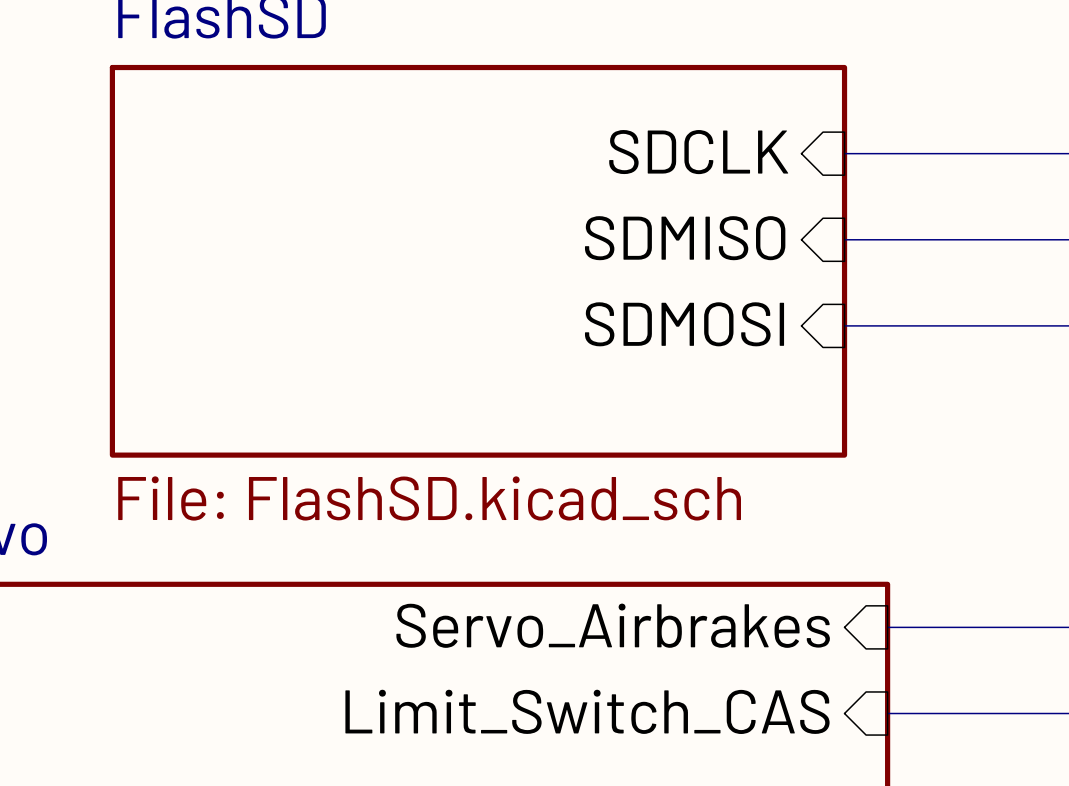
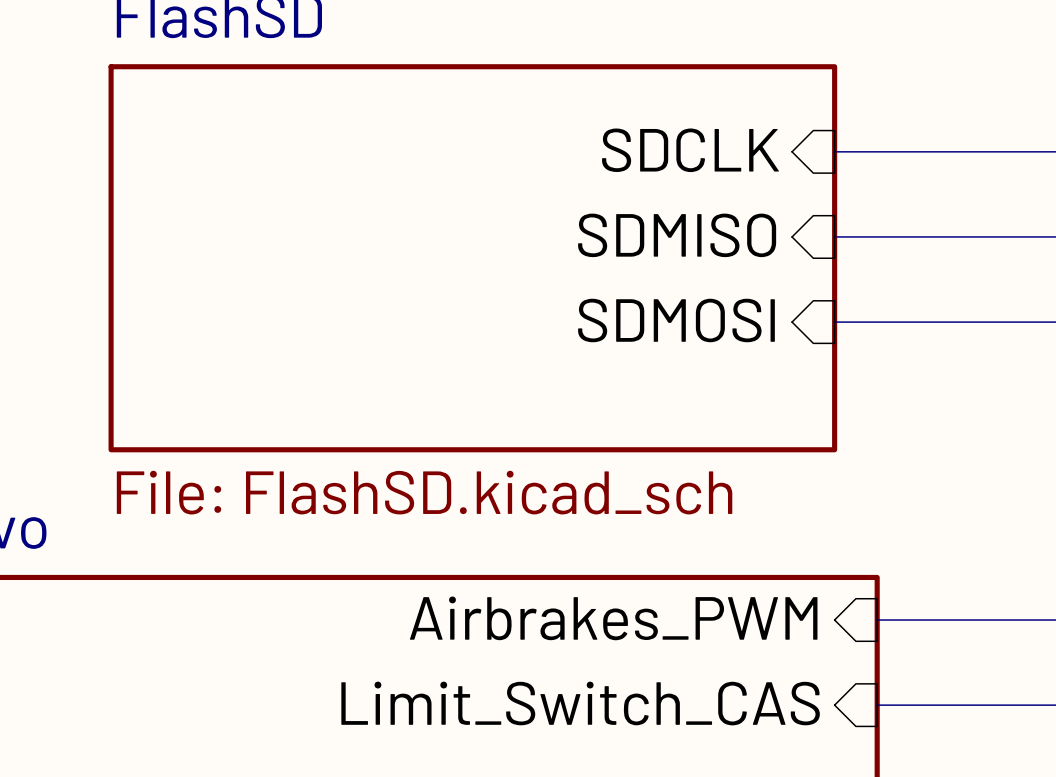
sheet pin: Servo_Airbrakes (613, 625) -> Airbrakes_PWM (613, 618)

